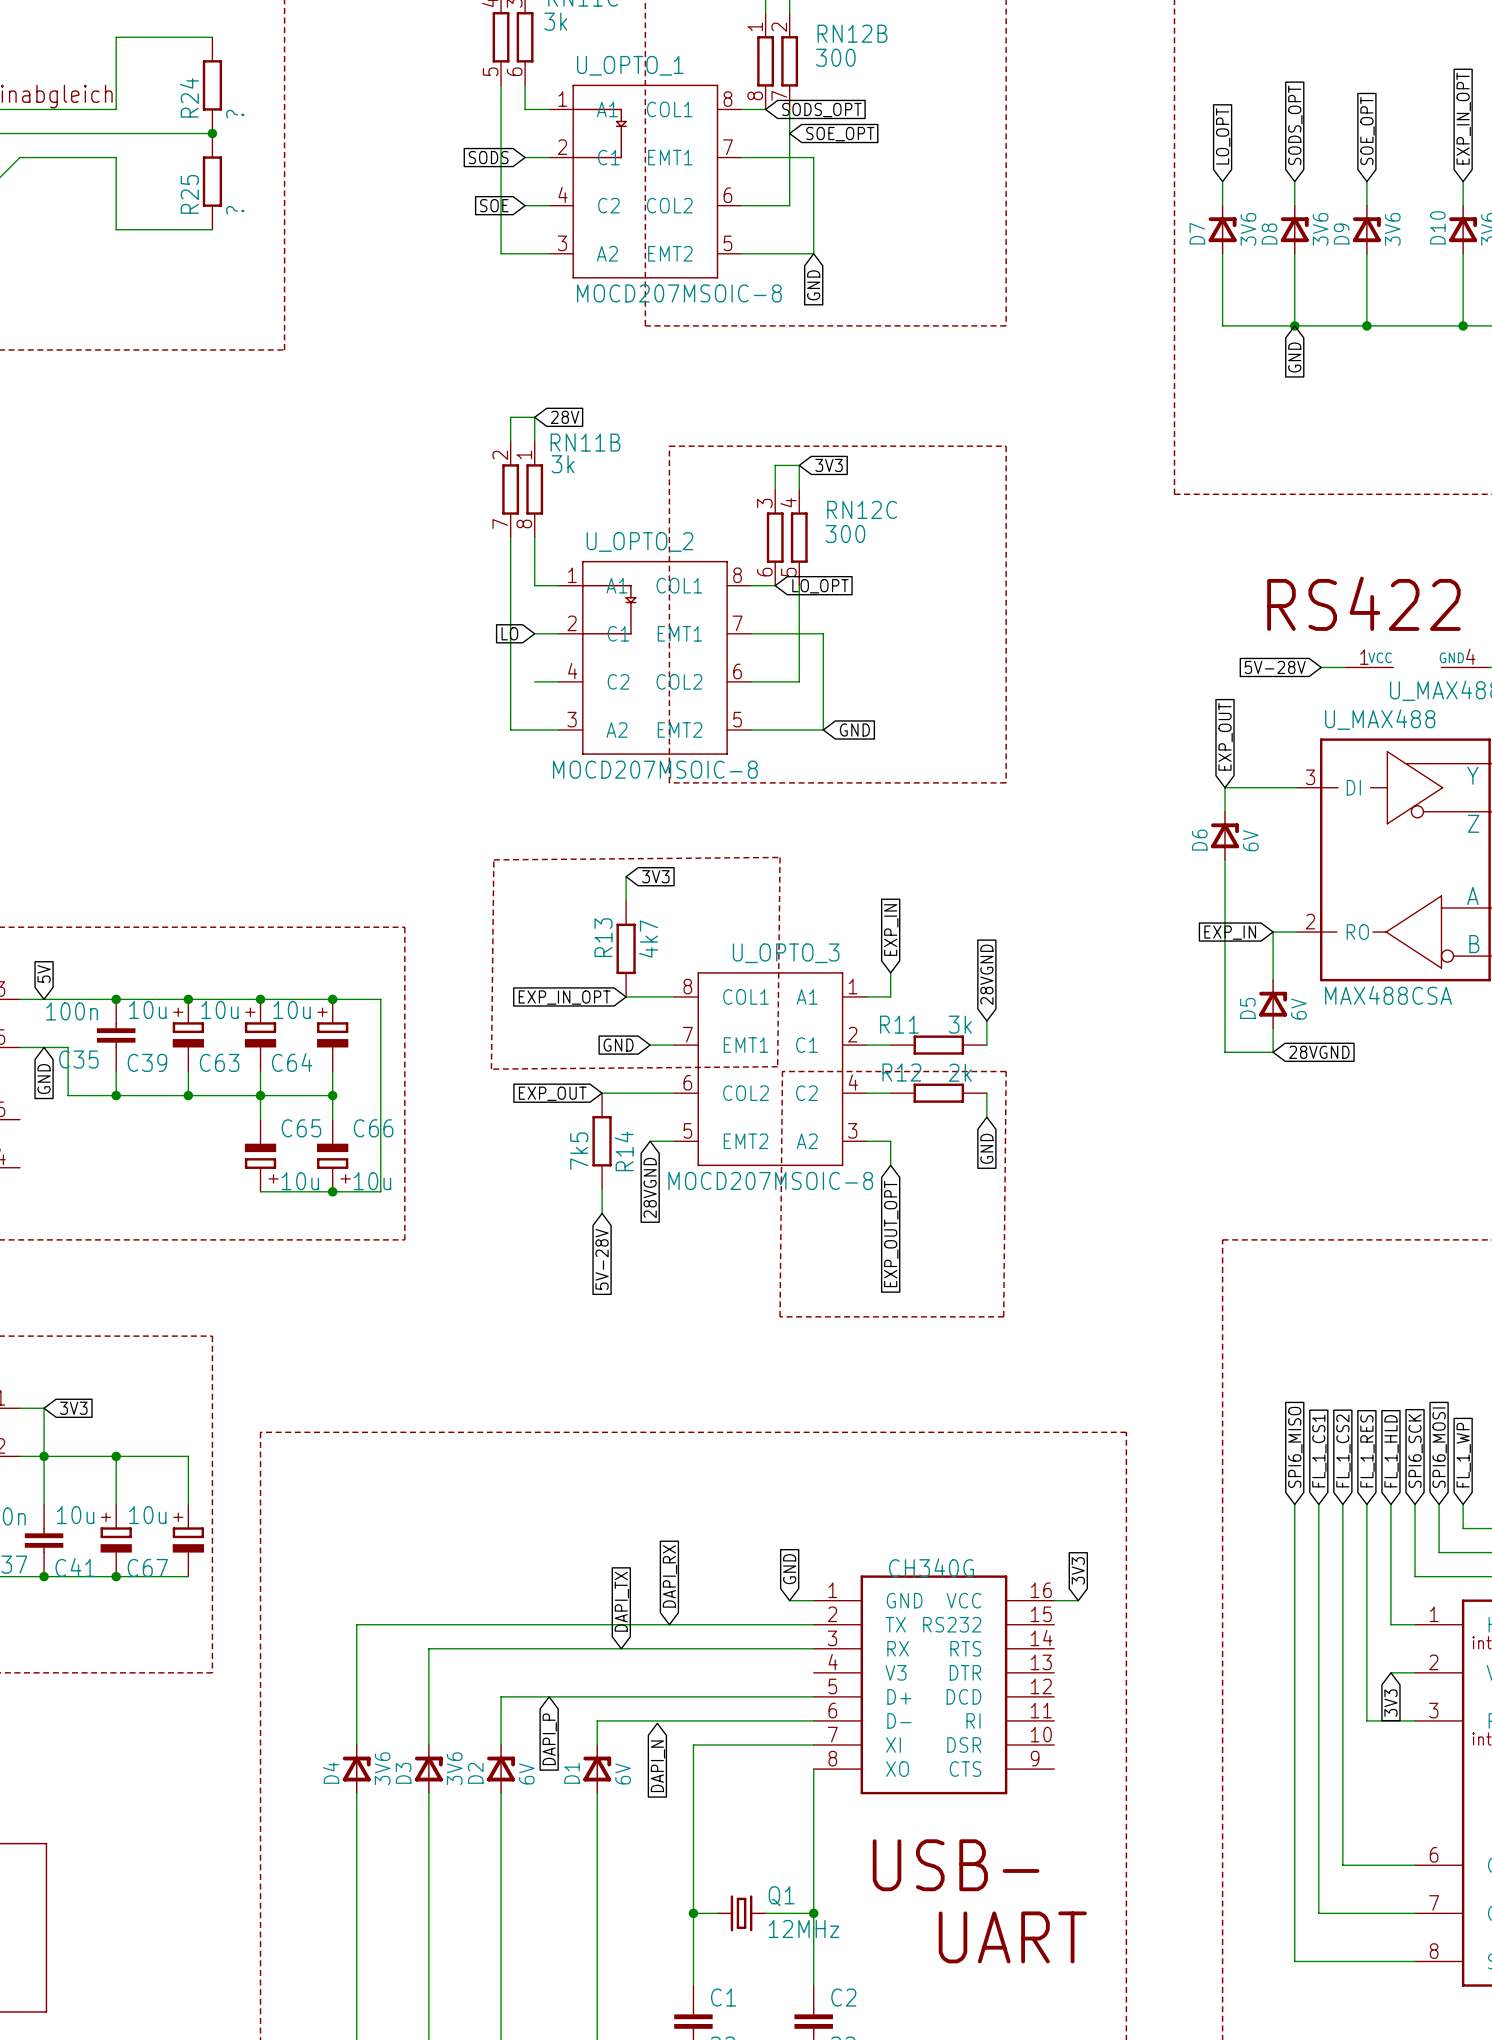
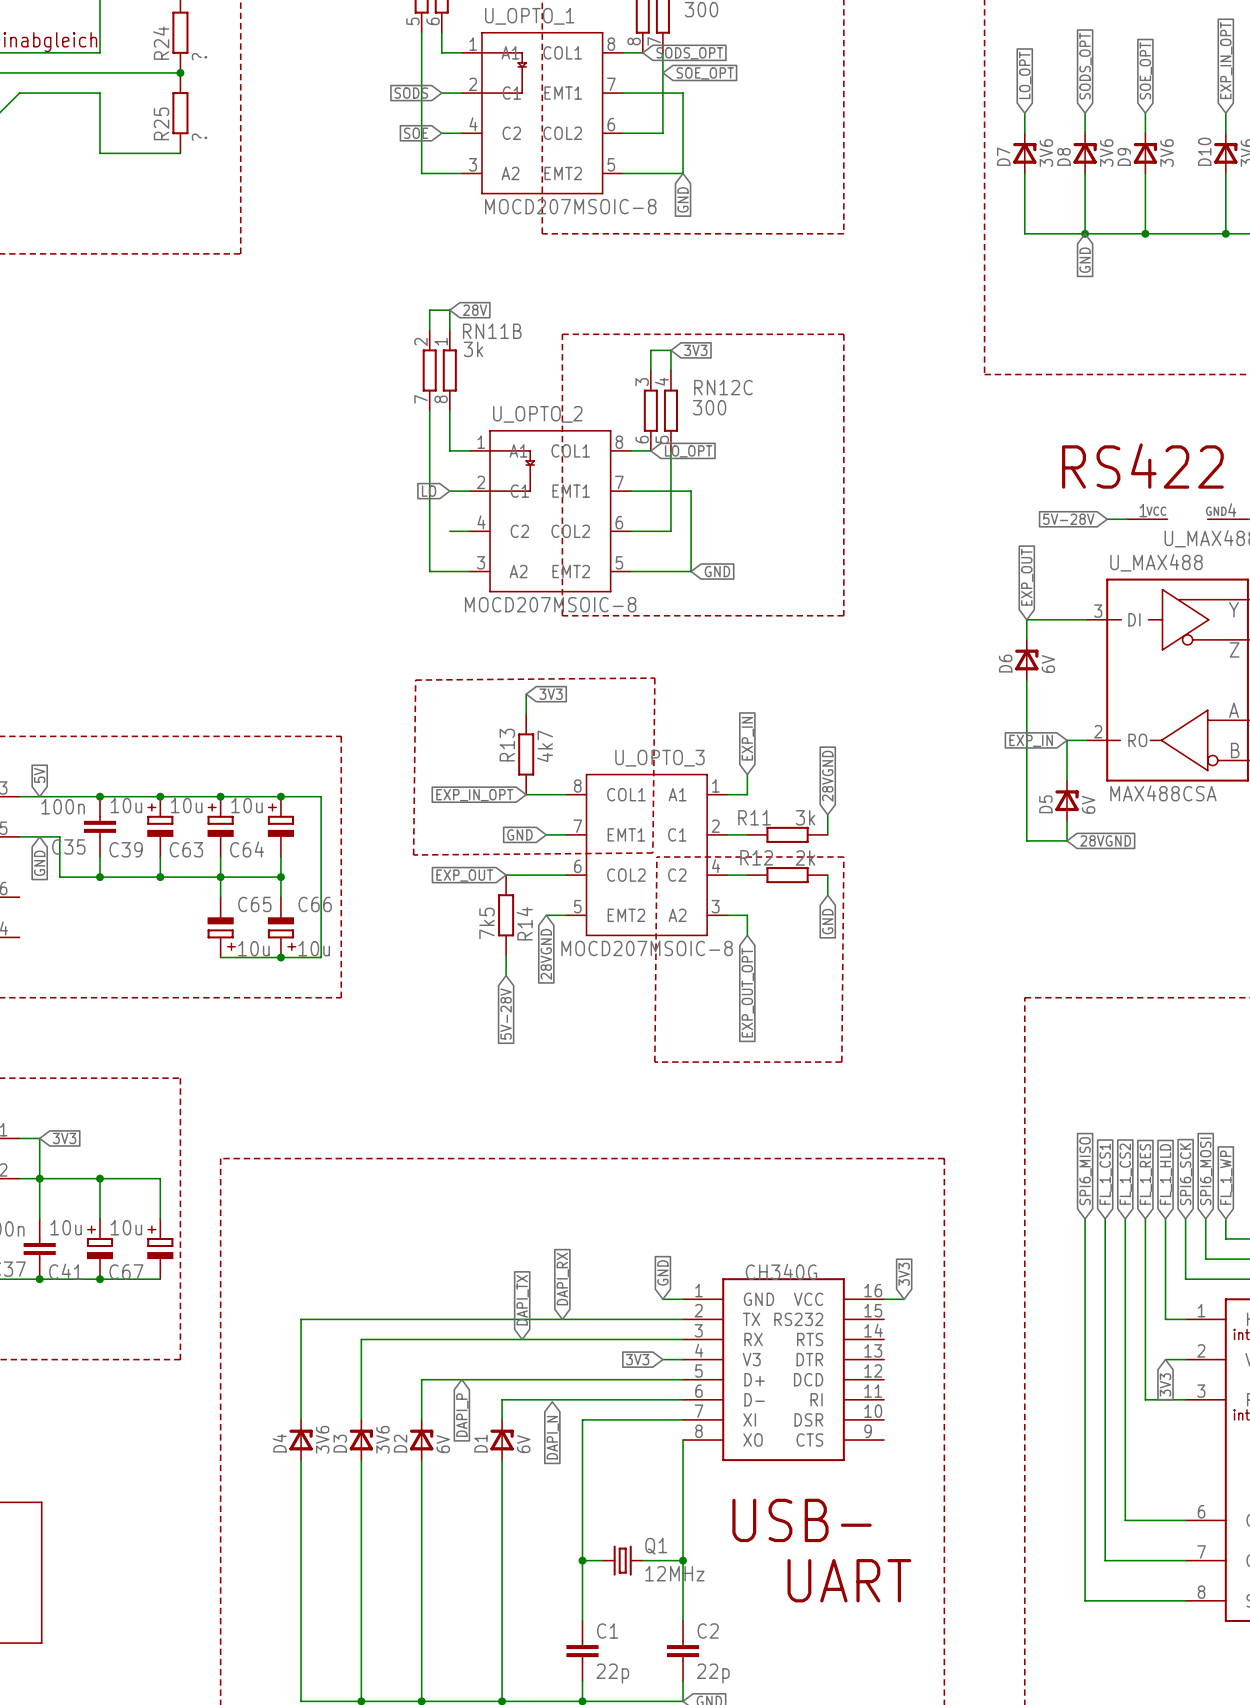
global label: none -> 3V3 (637, 1359)
wire: none -> (662, 1359) (683, 1359)

